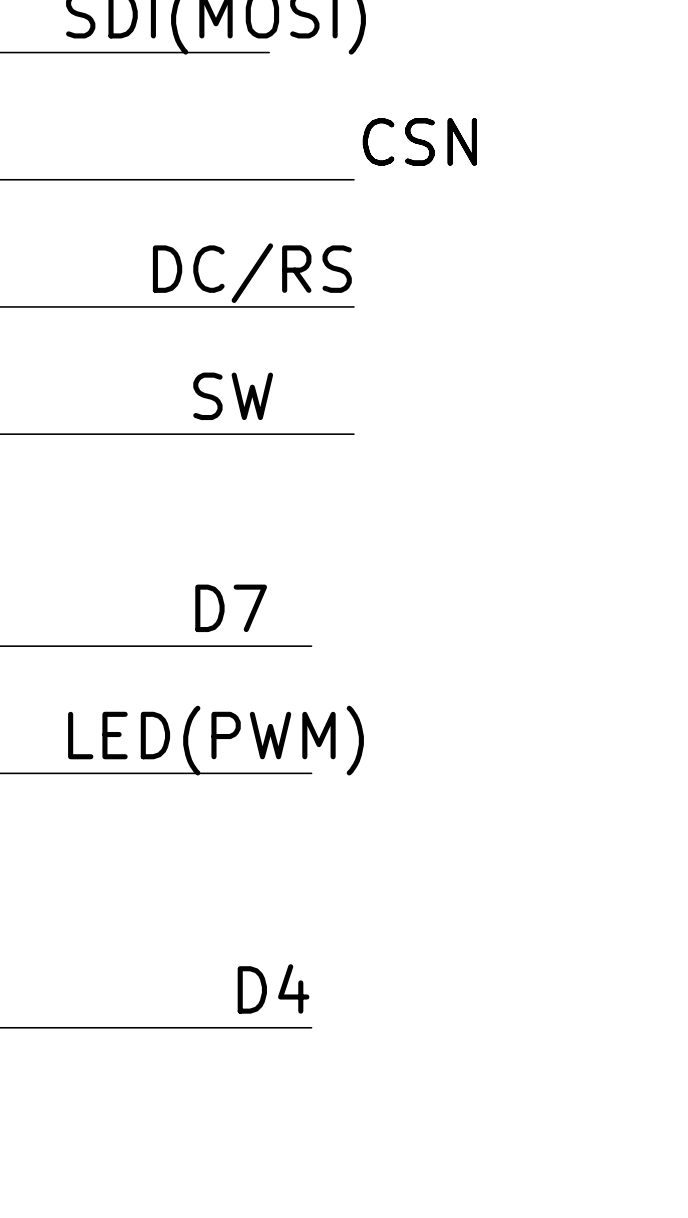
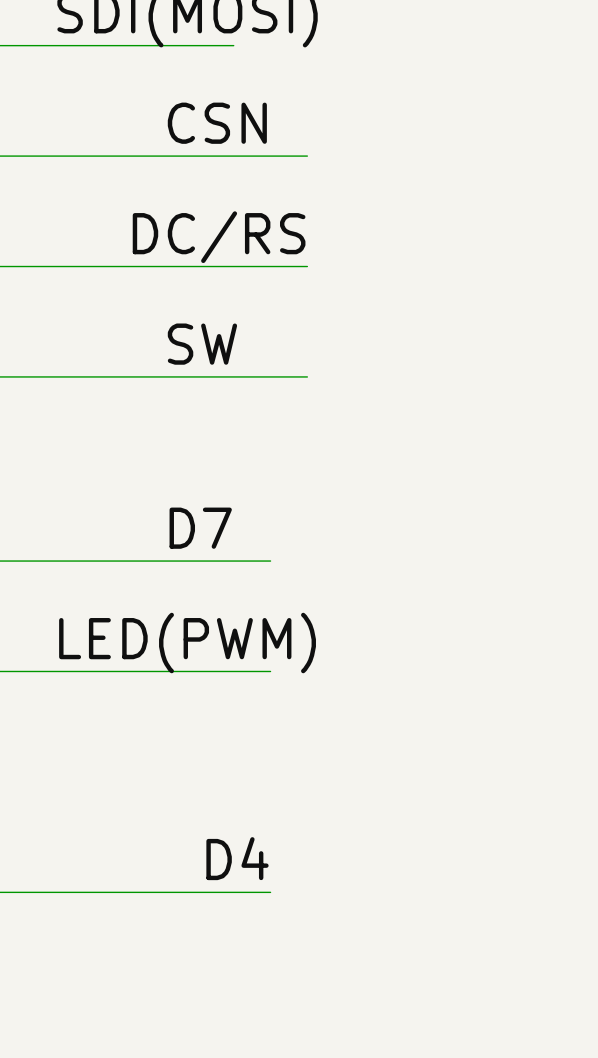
label position: CSN (419, 141) -> CSN (217, 123)

